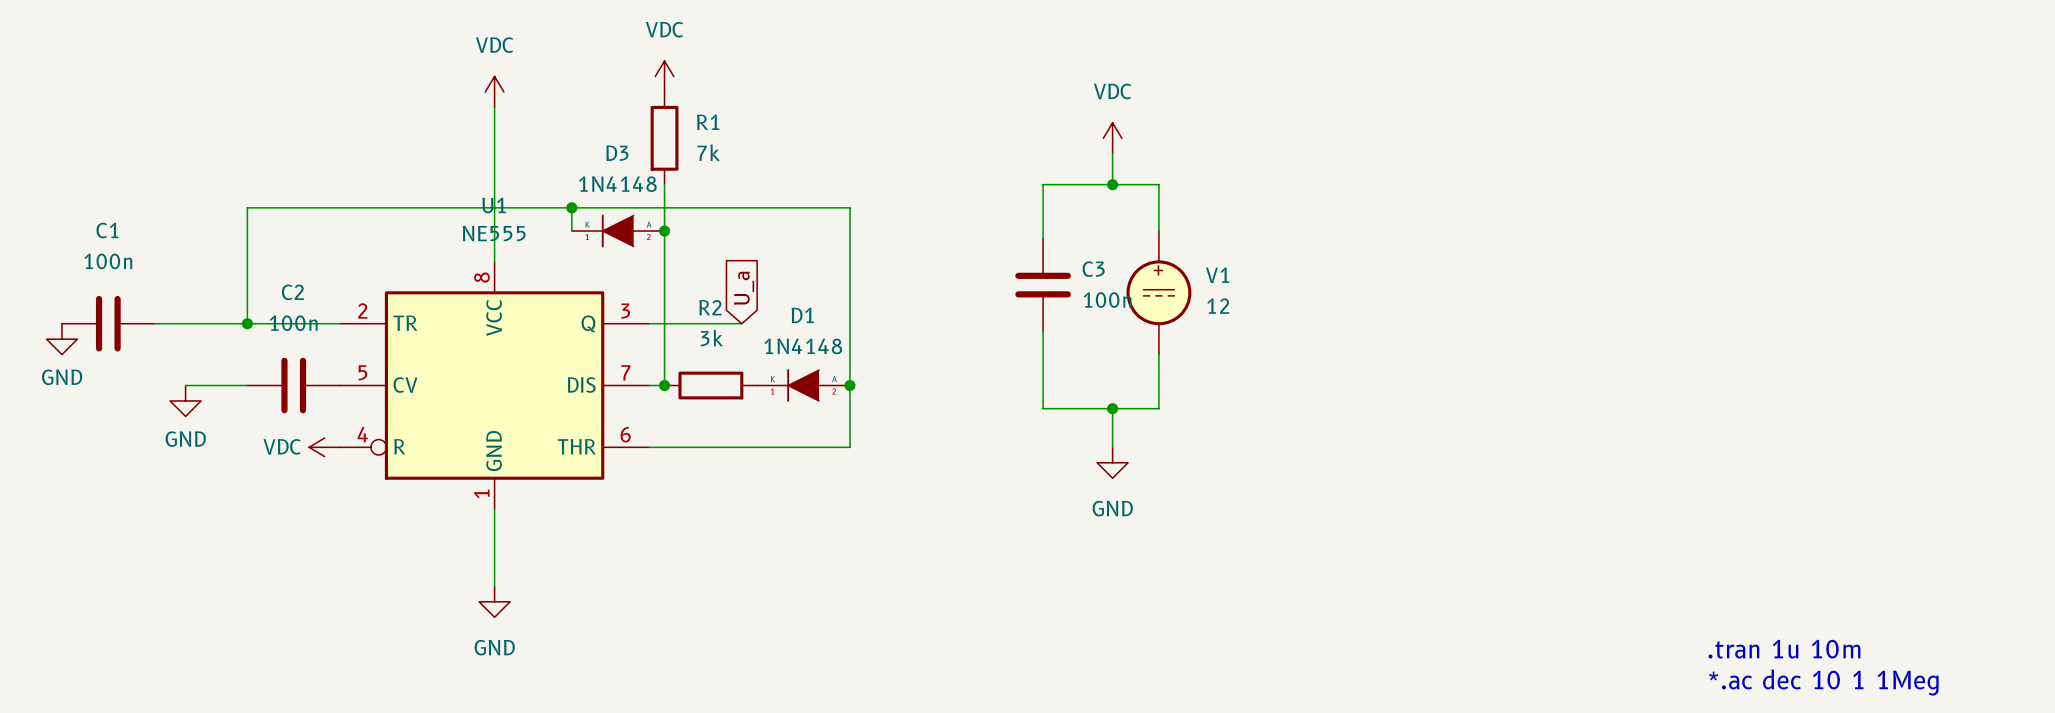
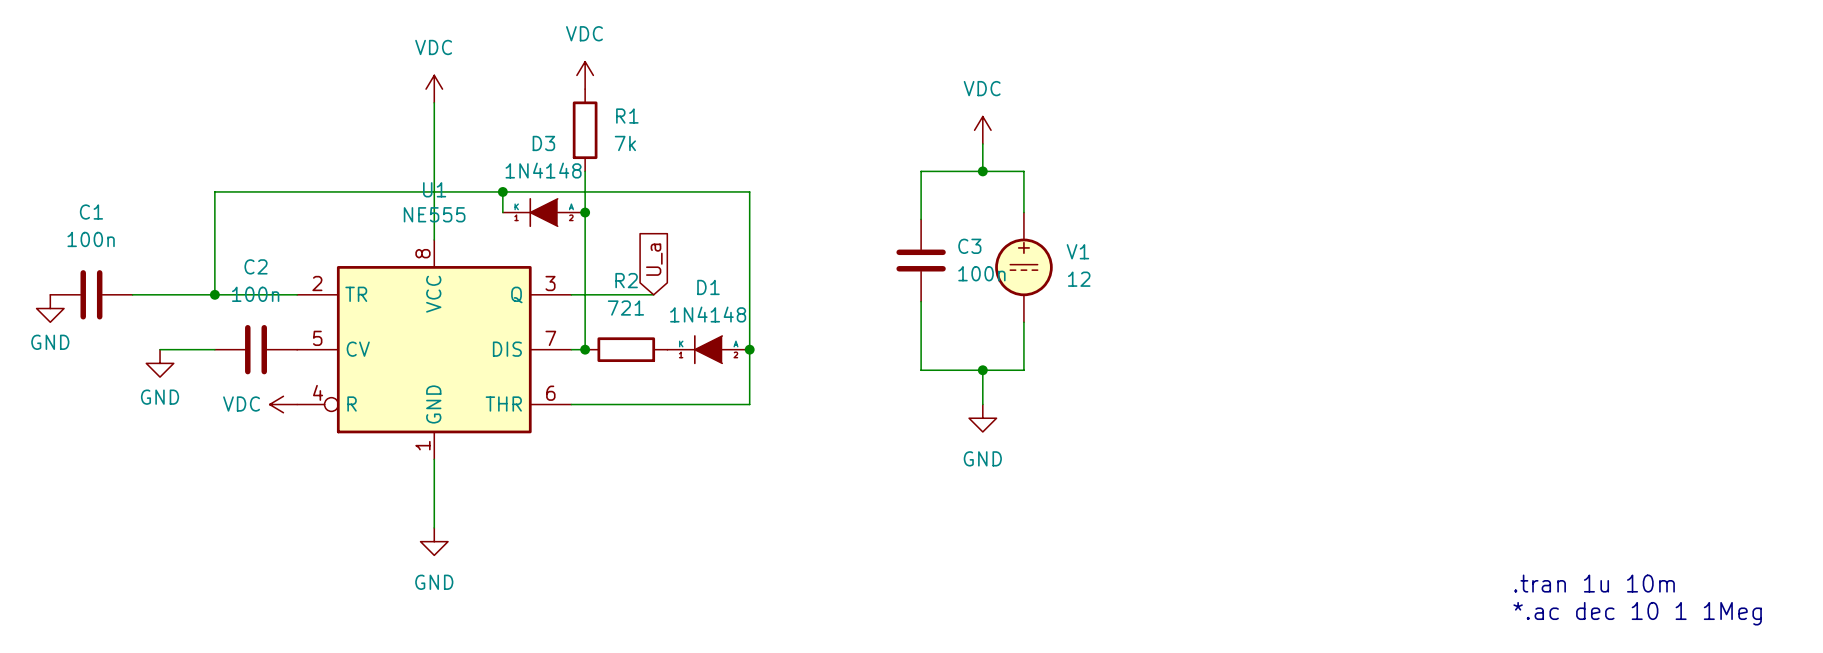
R2 value: 3k (711, 338) -> 721 (625, 308)

